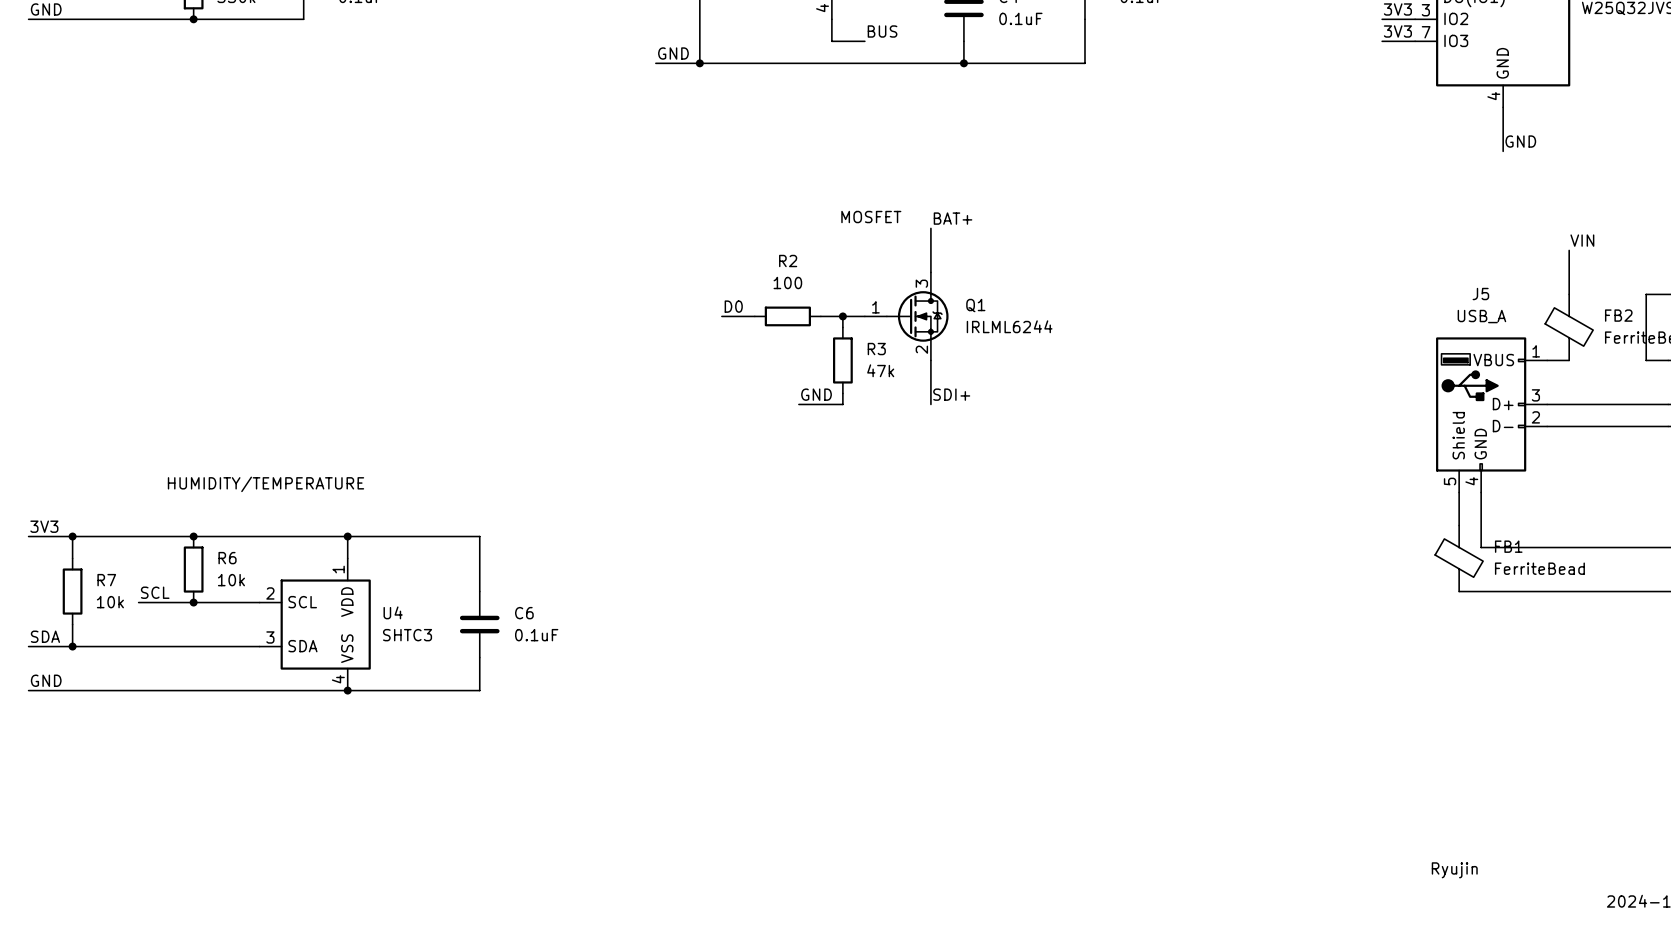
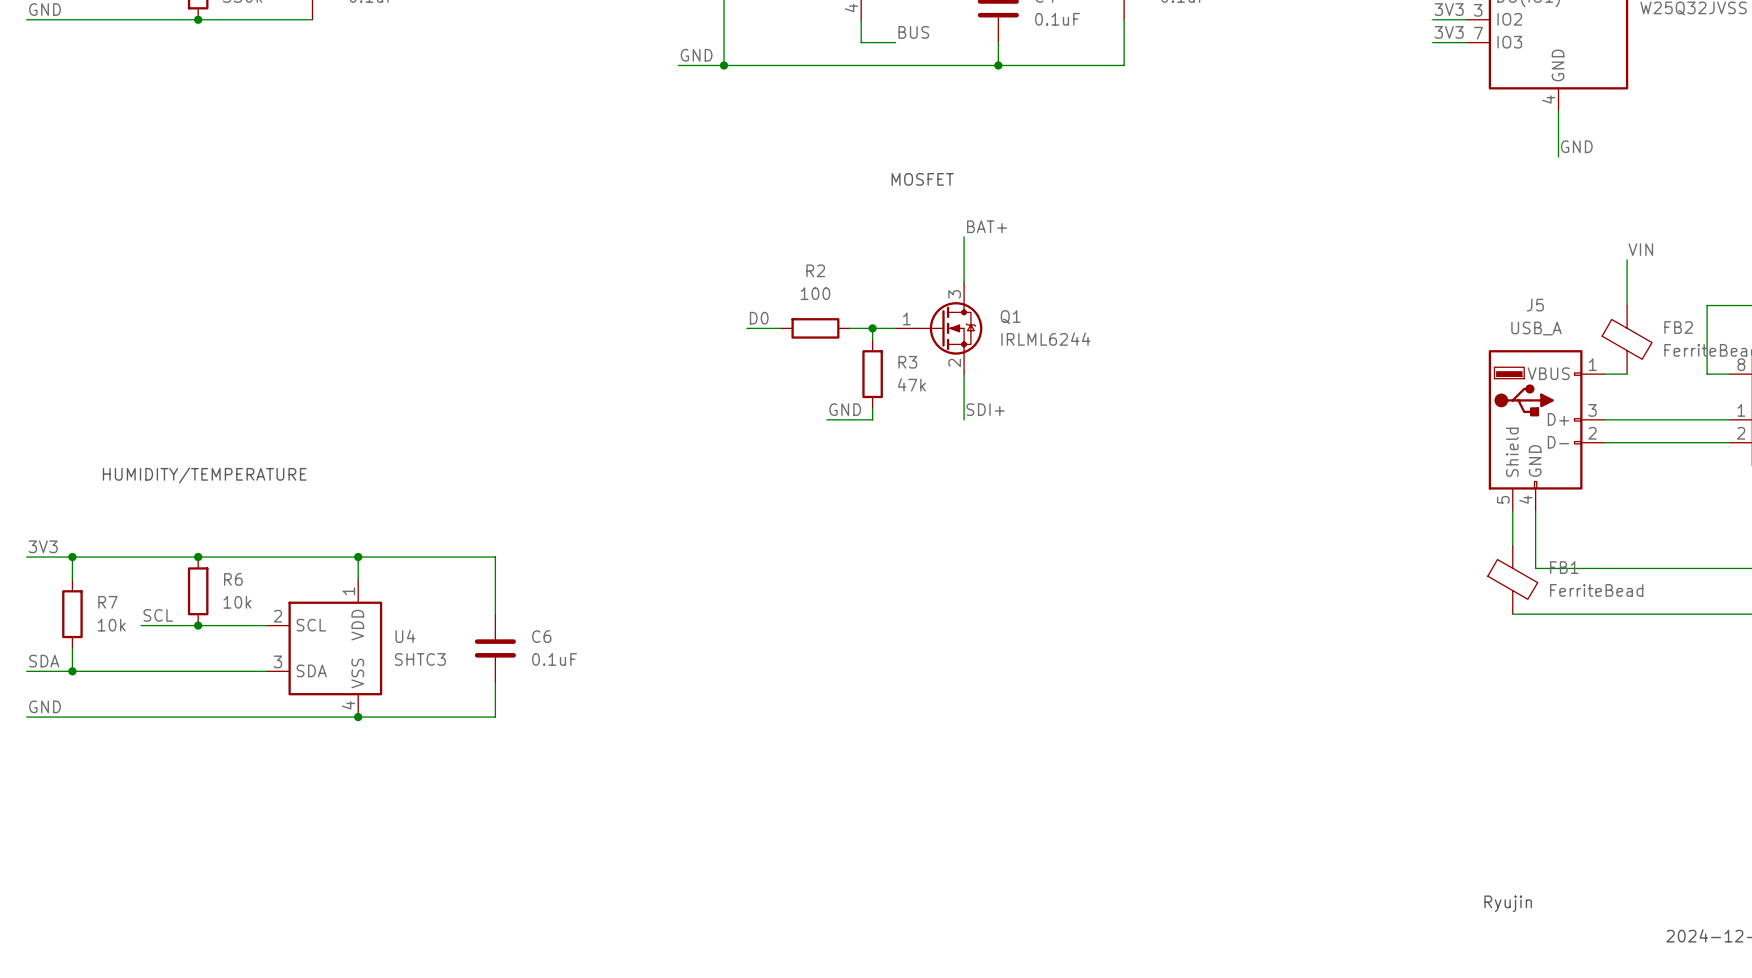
text position: MOSFET (871, 217) -> MOSFET (922, 179)
text position: HUMIDITY/TEMPERATURE (265, 484) -> HUMIDITY/TEMPERATURE (204, 475)

